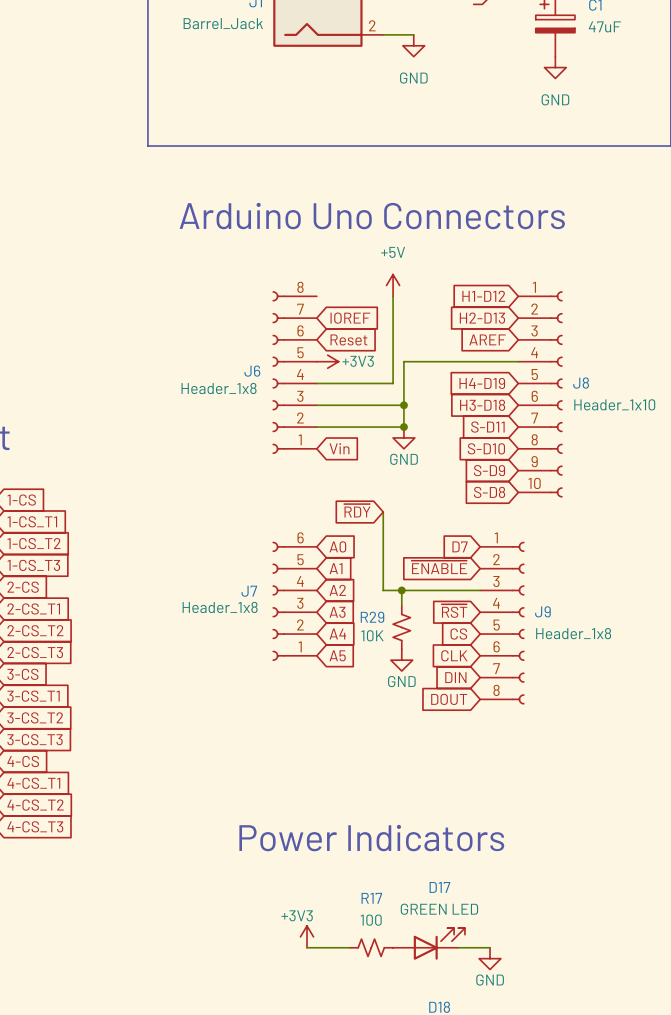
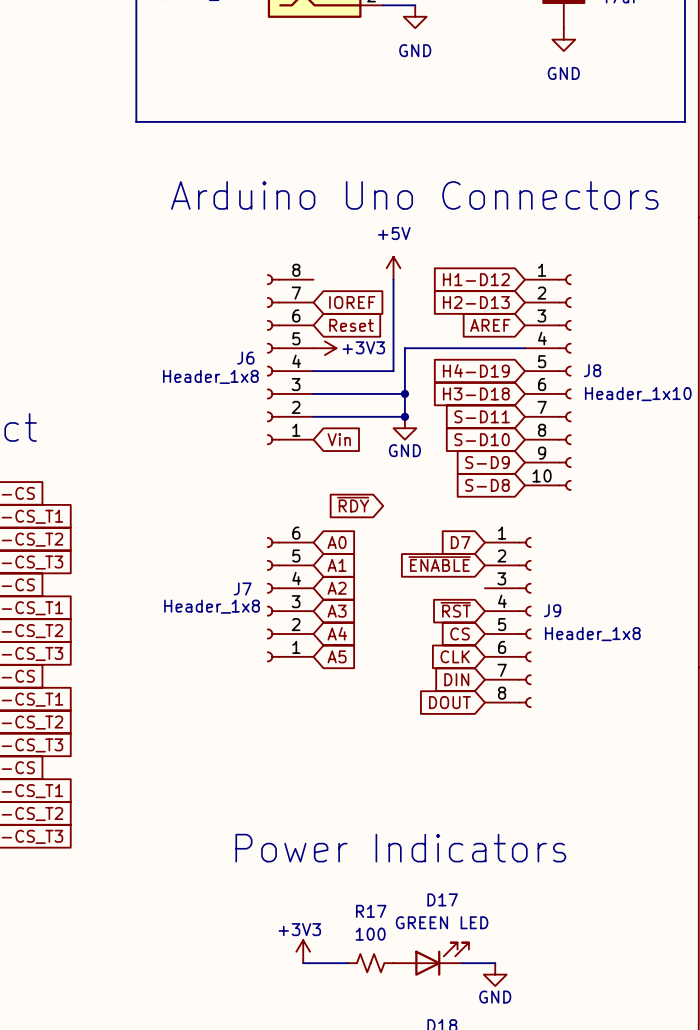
wire: (383, 512) (383, 590) (480, 590) -> none
wire: (401, 590) (401, 605) -> none
junction: (401, 590) -> none
R29: 10K (401, 627) -> none
power symbol: GND (401, 660) -> none

